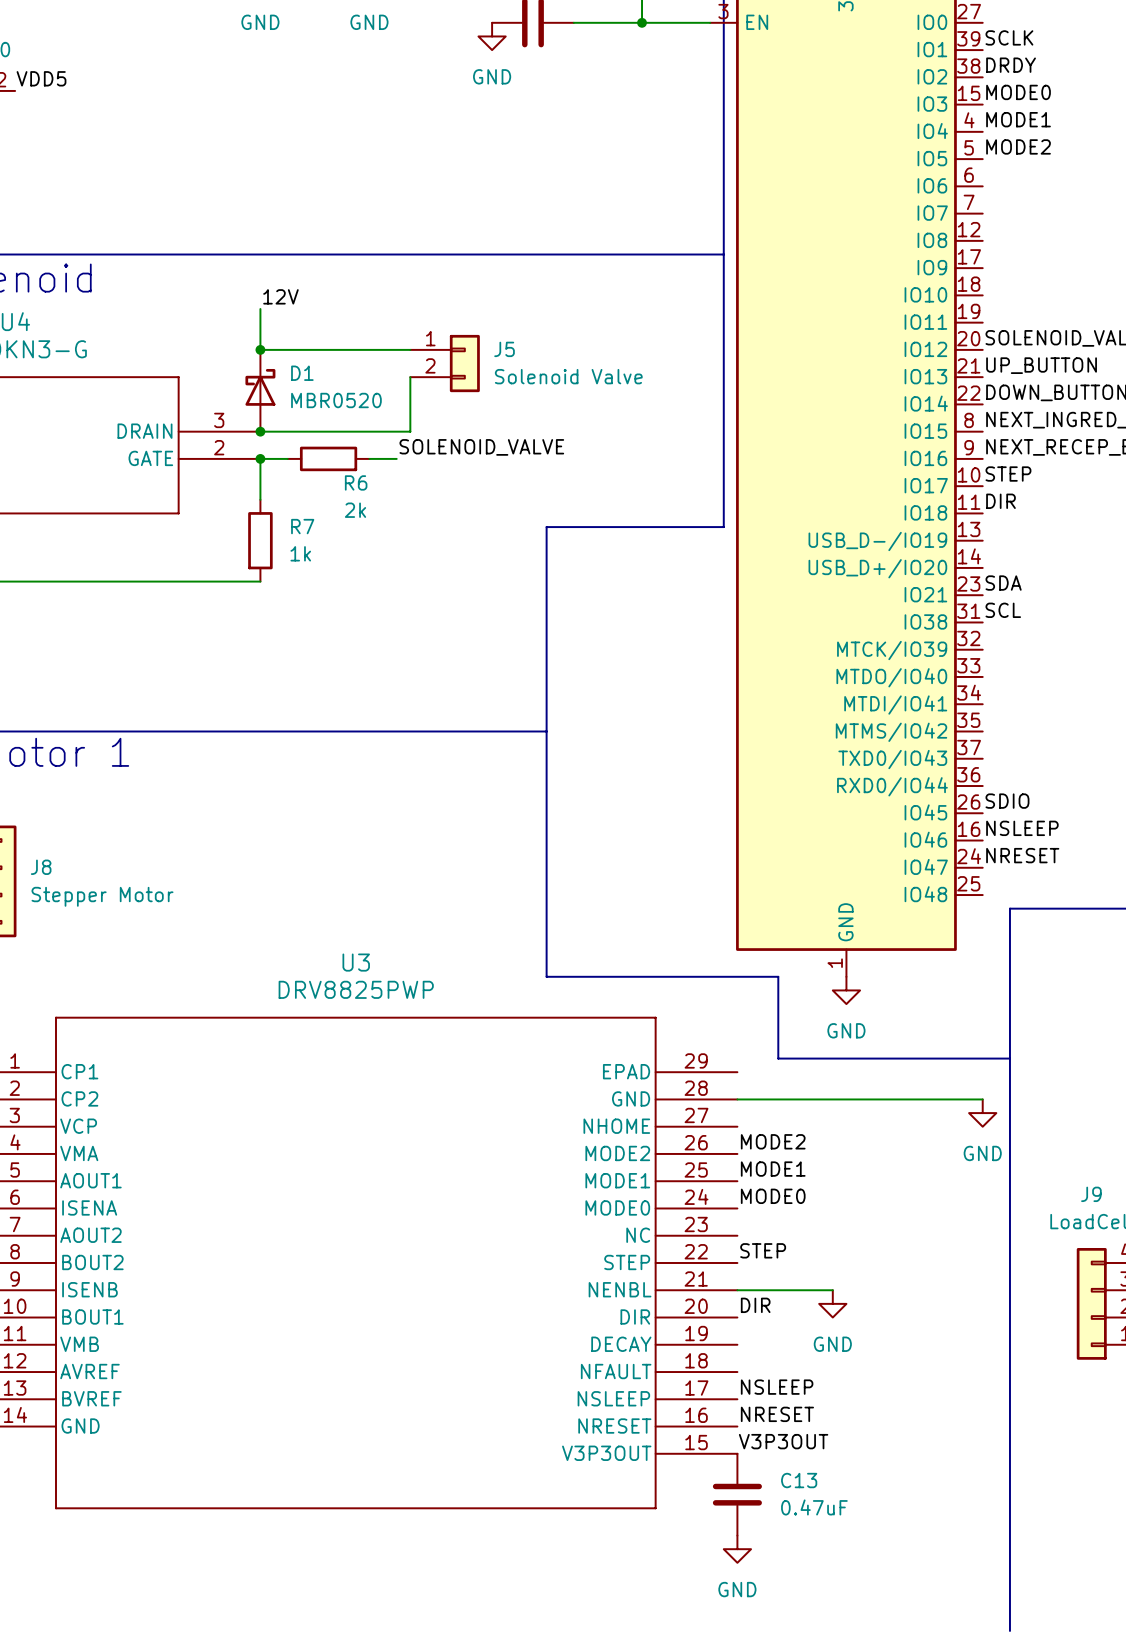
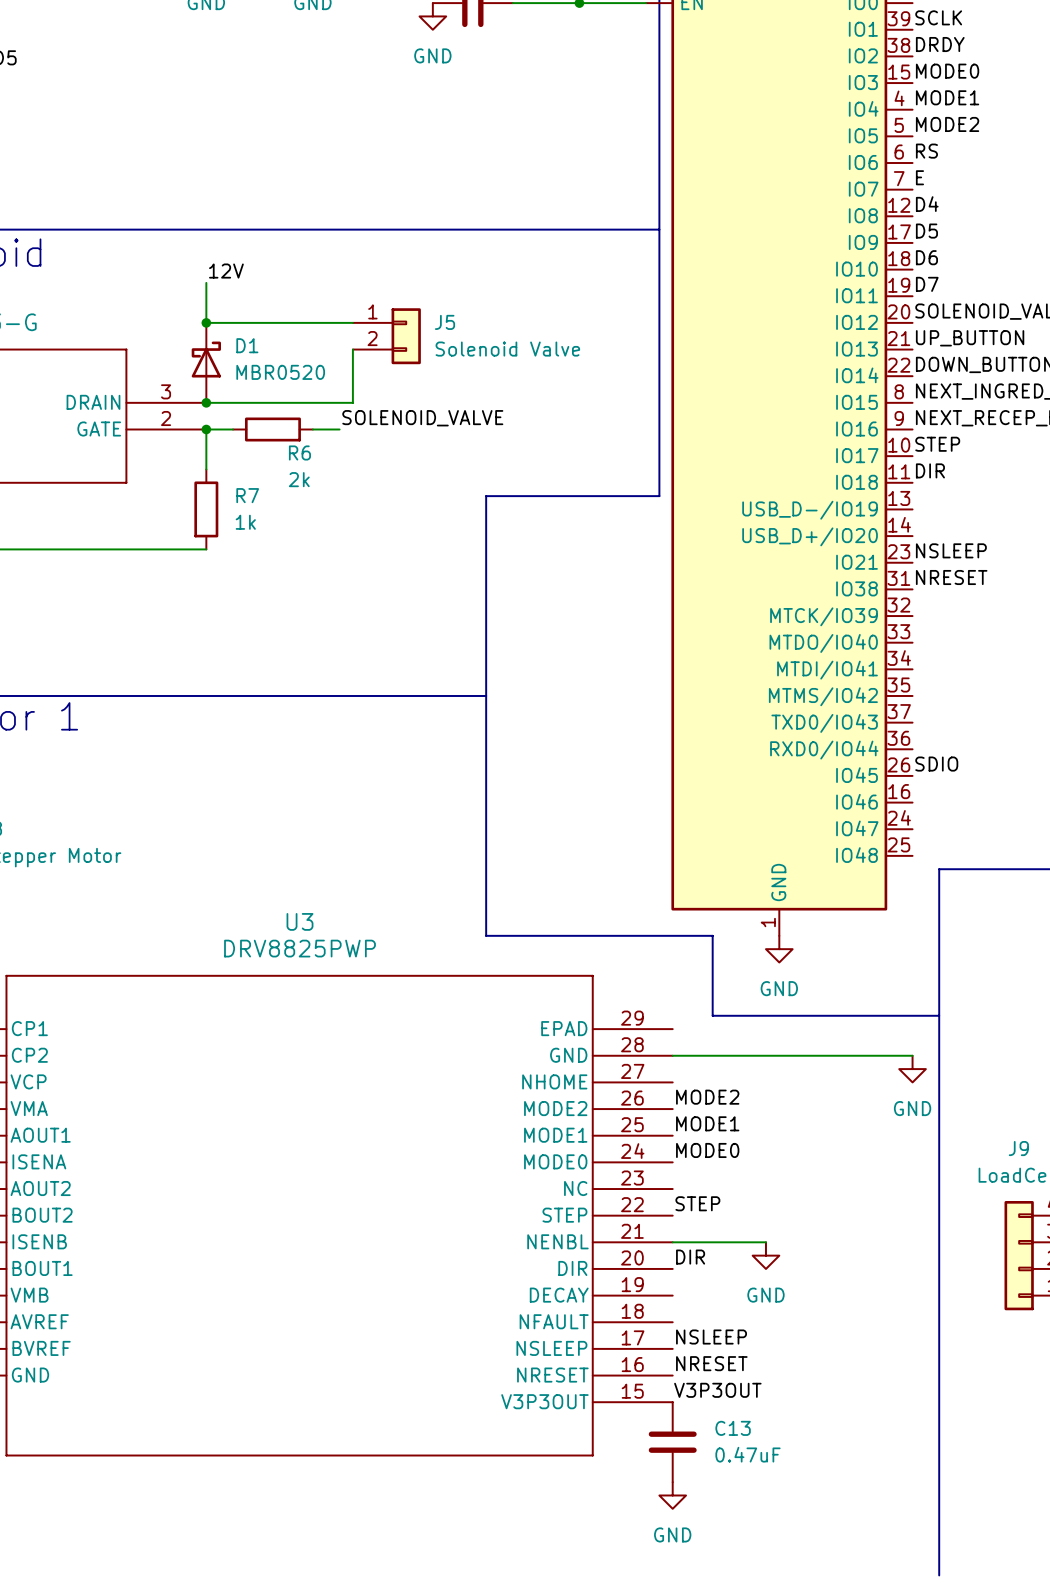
label: none -> RS (926, 151)
label: none -> E (919, 177)
label: none -> D4 (927, 204)
label: none -> D5 (926, 231)
label: none -> D6 (926, 257)
label: none -> D7 (927, 284)
label: SDA (1003, 583) -> NSLEEP (951, 550)
label: SCL (1003, 610) -> NRESET (951, 577)
label: NSLEEP (1022, 828) -> none
label: NRESET (1022, 855) -> none

